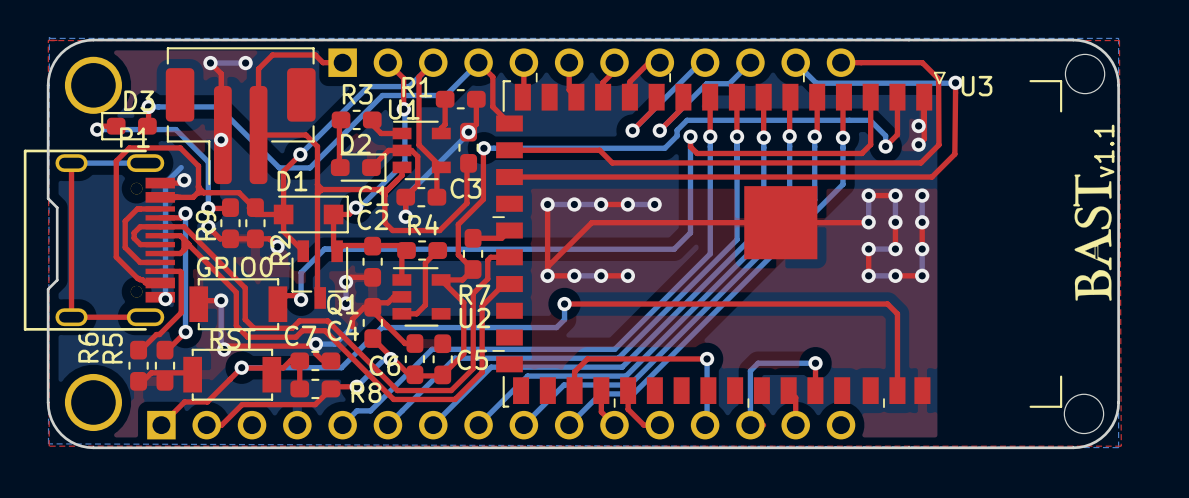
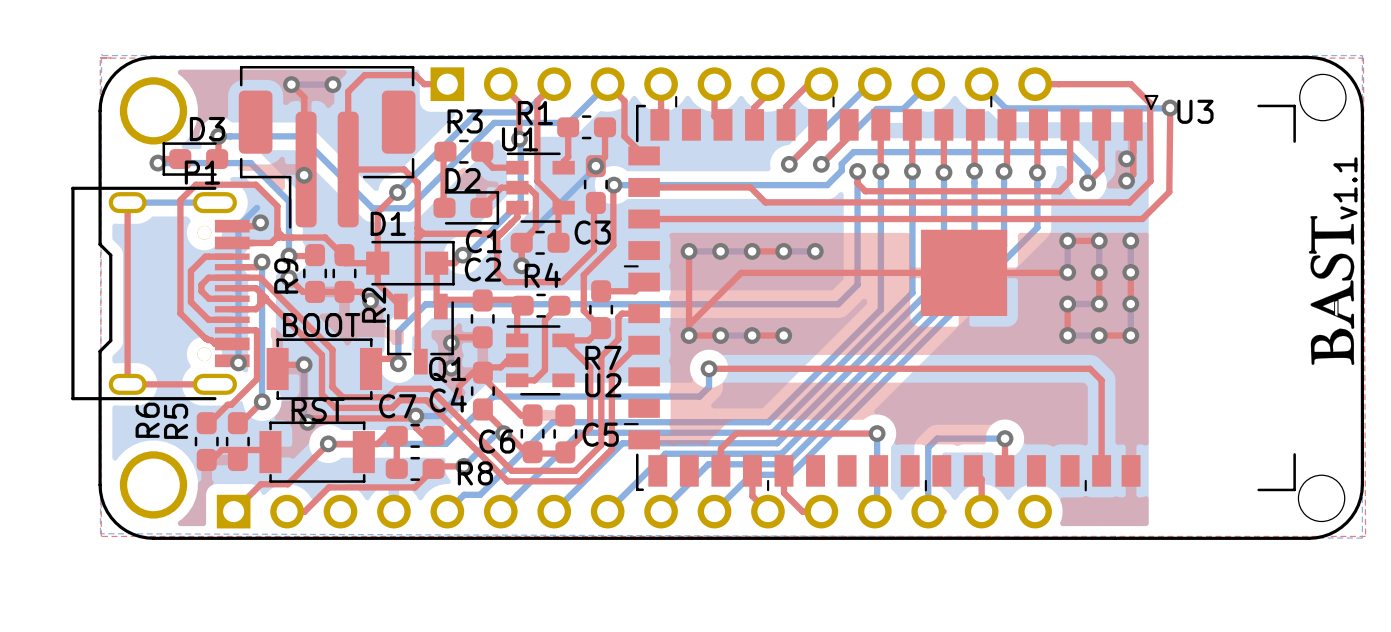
GPIO0 name: GPIO0 (234, 266) -> BOOT (321, 325)

